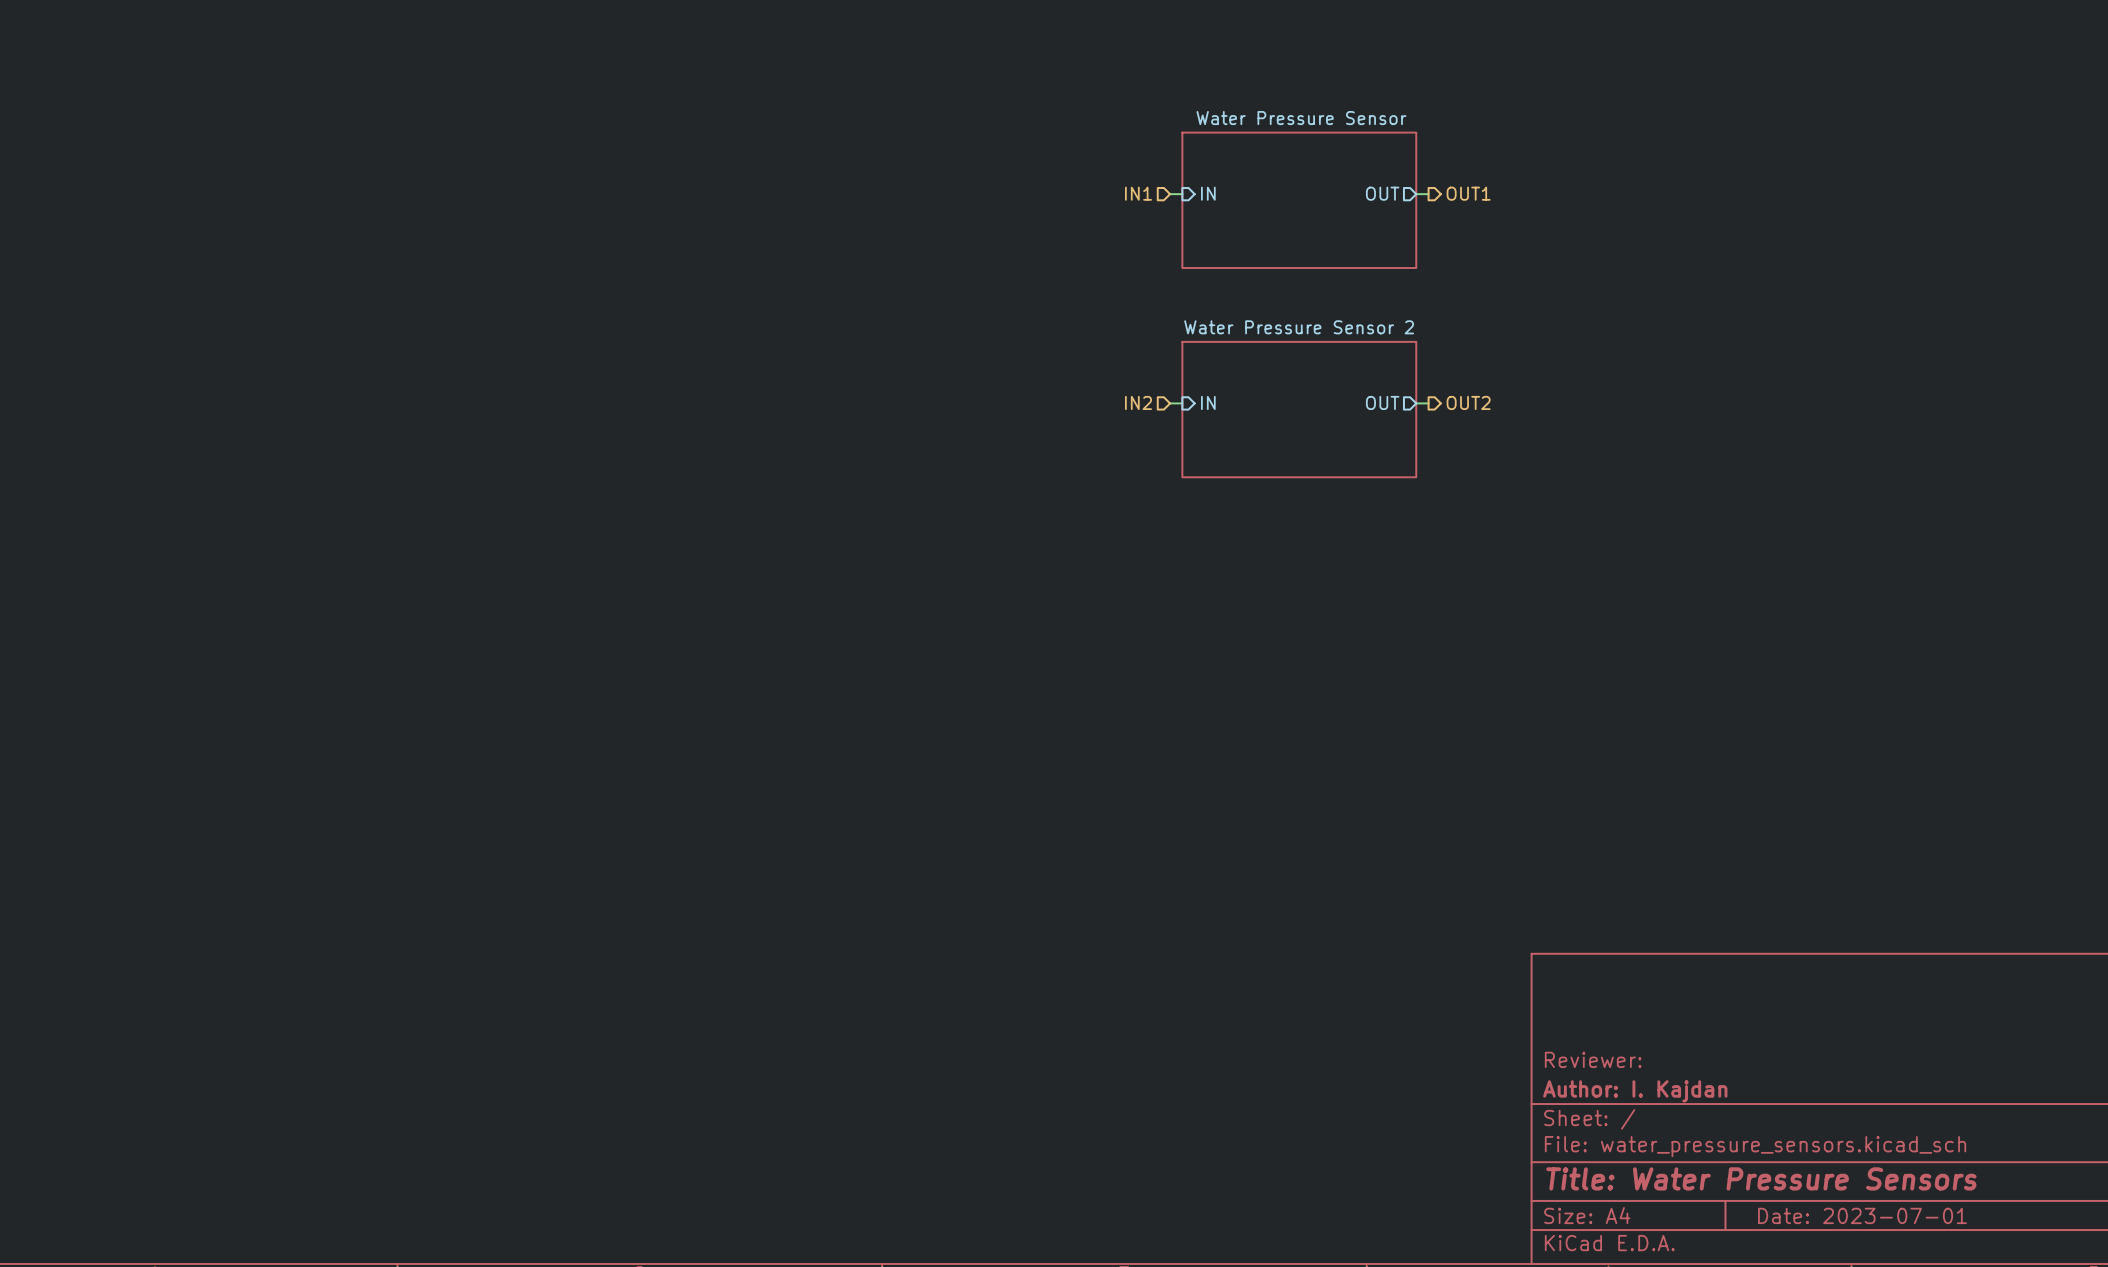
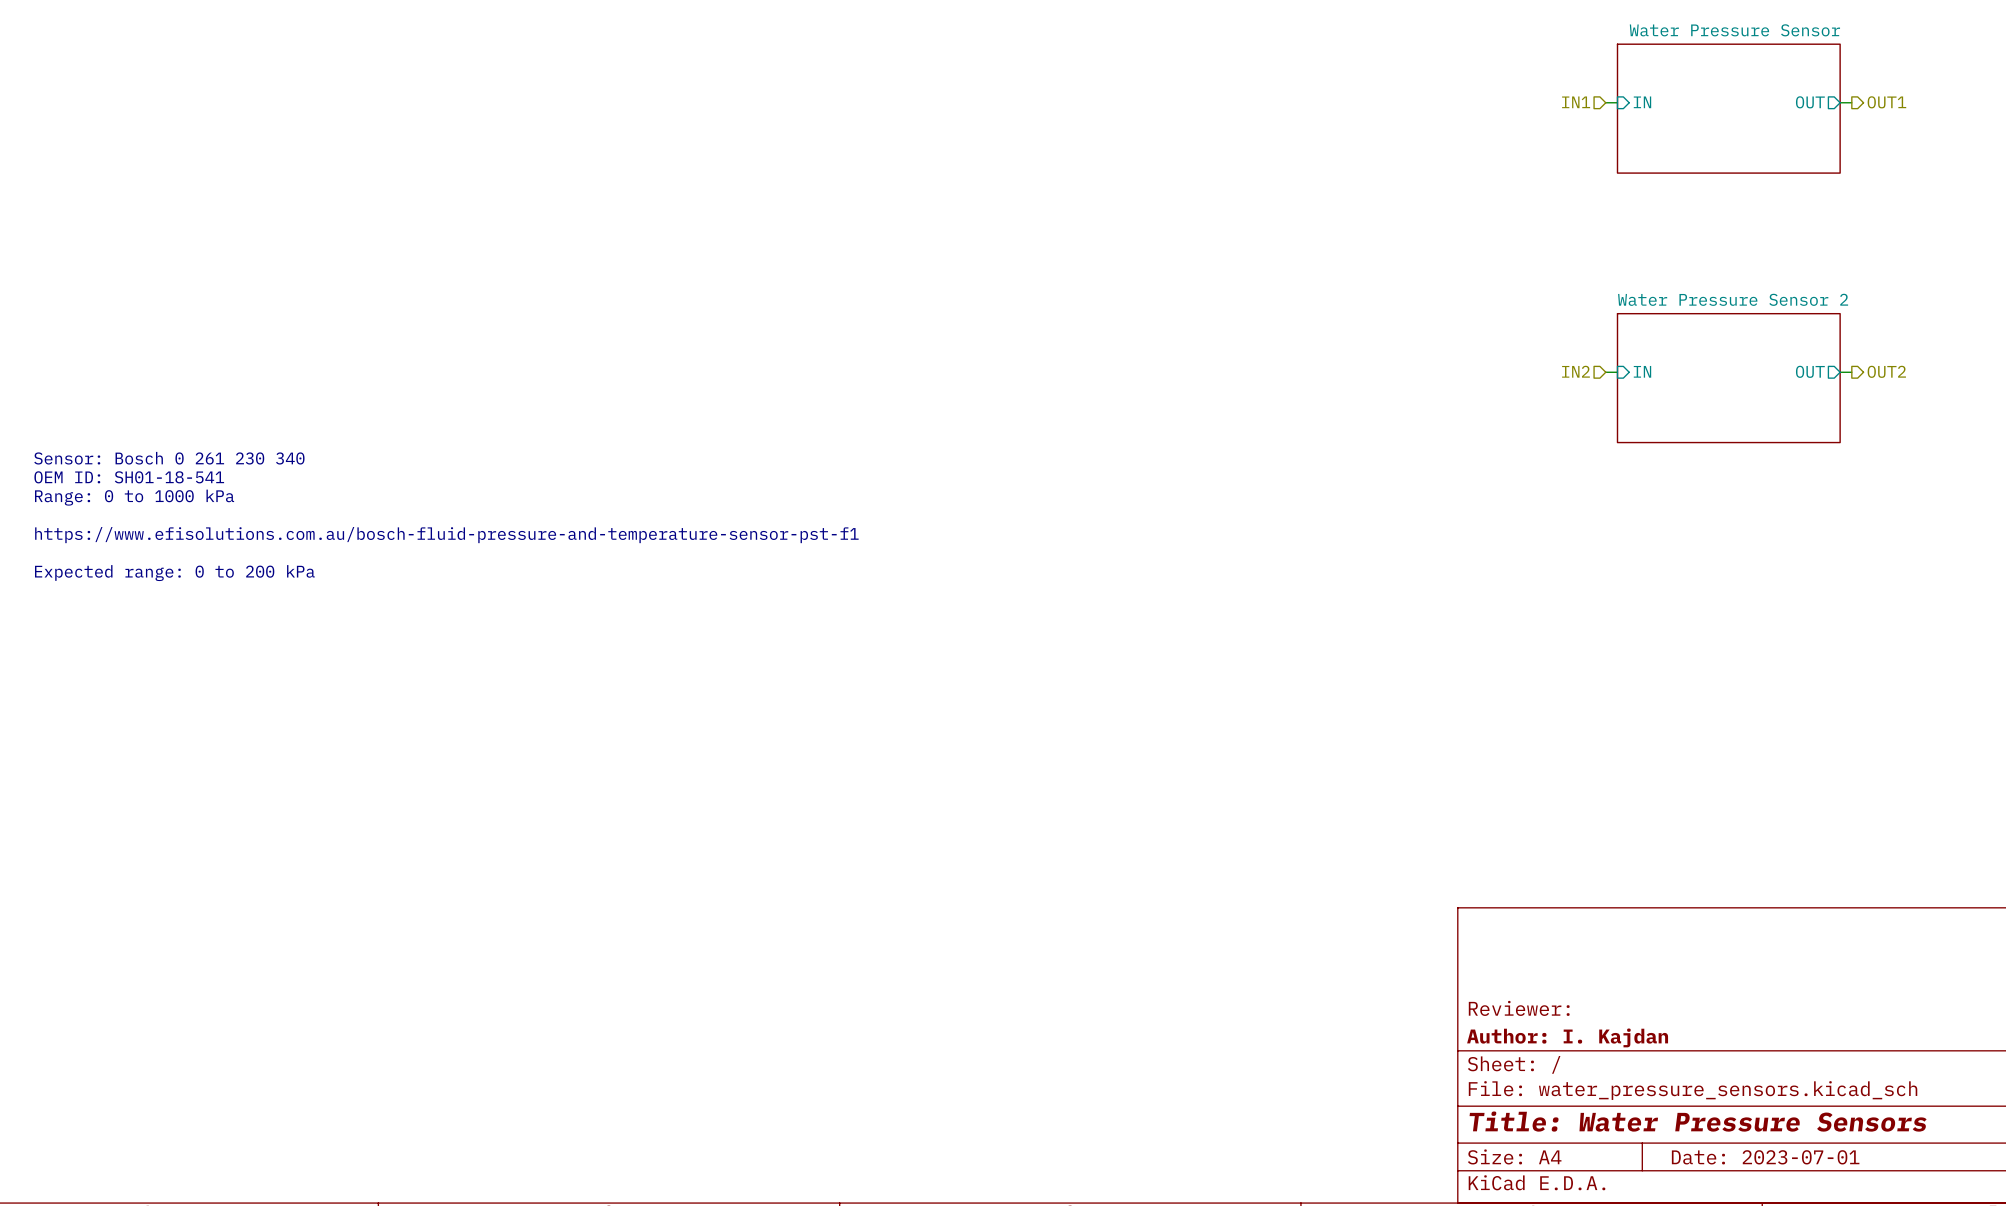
hierarchical label: none -> IN1 (1576, 102)
wire: none -> (1605, 102) (1617, 102)
sheet pin: none -> IN (1642, 102)
sheet pin: none -> OUT (1810, 102)
wire: none -> (1840, 102) (1851, 102)
hierarchical label: none -> OUT1 (1886, 102)
sheet Water Pressure Sensor: none -> (1728, 108)
hierarchical label: IN1 (1138, 193) -> none
sheet pin: IN (1208, 193) -> none
sheet pin: OUT (1382, 193) -> none
hierarchical label: OUT1 (1468, 193) -> none
wire: (1170, 194) (1182, 194) -> none
wire: (1416, 194) (1428, 194) -> none
sheet Water Pressure Sensor: (1299, 200) -> none
hierarchical label: none -> IN2 (1575, 371)
sheet pin: none -> IN (1642, 371)
sheet pin: none -> OUT (1810, 371)
hierarchical label: none -> OUT2 (1886, 371)
wire: none -> (1605, 372) (1617, 372)
wire: none -> (1840, 372) (1851, 372)
hierarchical label: IN2 (1138, 402) -> none
sheet pin: IN (1208, 402) -> none
sheet pin: OUT (1382, 402) -> none
hierarchical label: OUT2 (1468, 402) -> none
wire: (1170, 403) (1182, 403) -> none
wire: (1416, 403) (1428, 403) -> none
sheet Water Pressure Sensor 2 position: (1299, 409) -> (1728, 378)
text: none -> Sensor: Bosch 0 261 230 340 (169, 458)
text: none -> OEM ID: SH01-18-541 (129, 477)
text: none -> Range: 0 to 1000 kPa (134, 497)
text: none -> https://www.efisolutions.com.au/bosch-fluid-pressure-and-temperature-sensor-pst-f1 (446, 535)
text: none -> Expected range: 0 to 200 kPa (174, 573)

